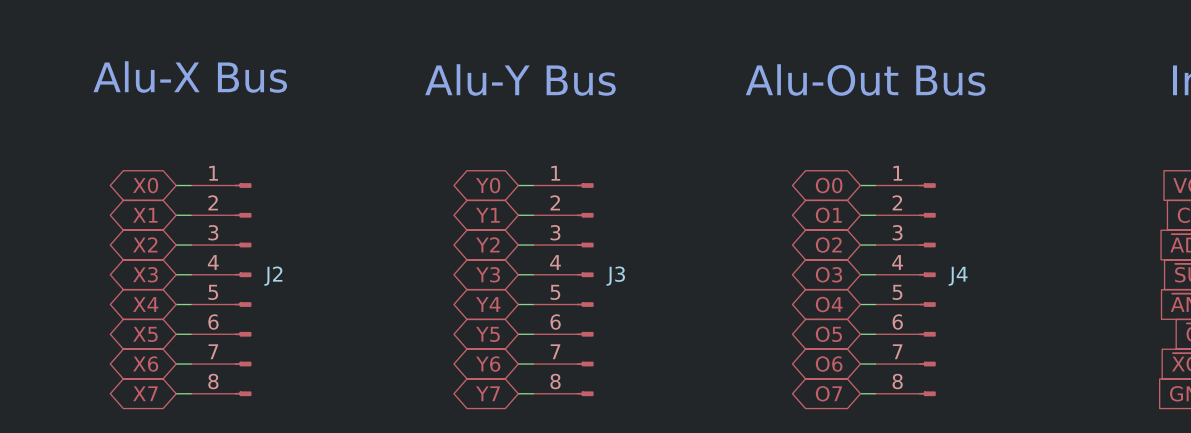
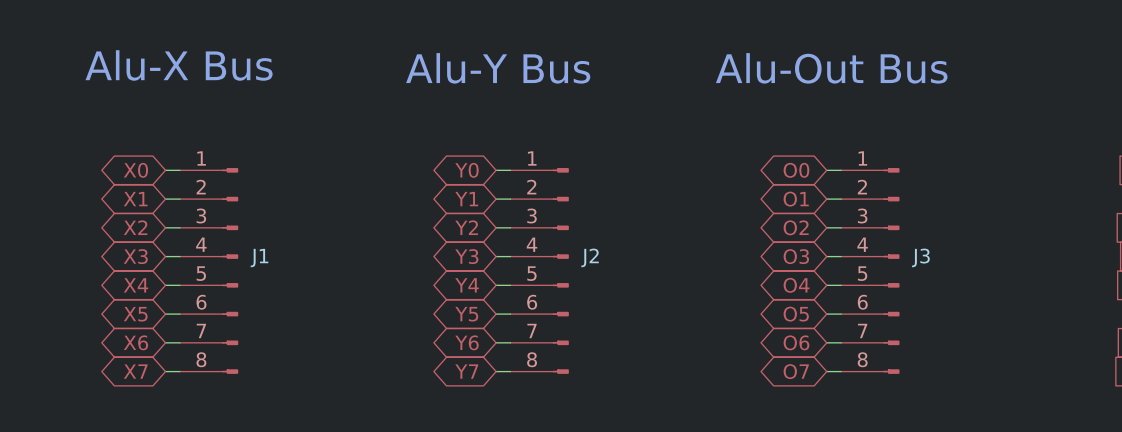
J2 name: J2 (273, 276) -> J1 (259, 258)
J3 name: J3 (615, 276) -> J2 (590, 257)
J4 name: J4 (958, 276) -> J3 (920, 257)

